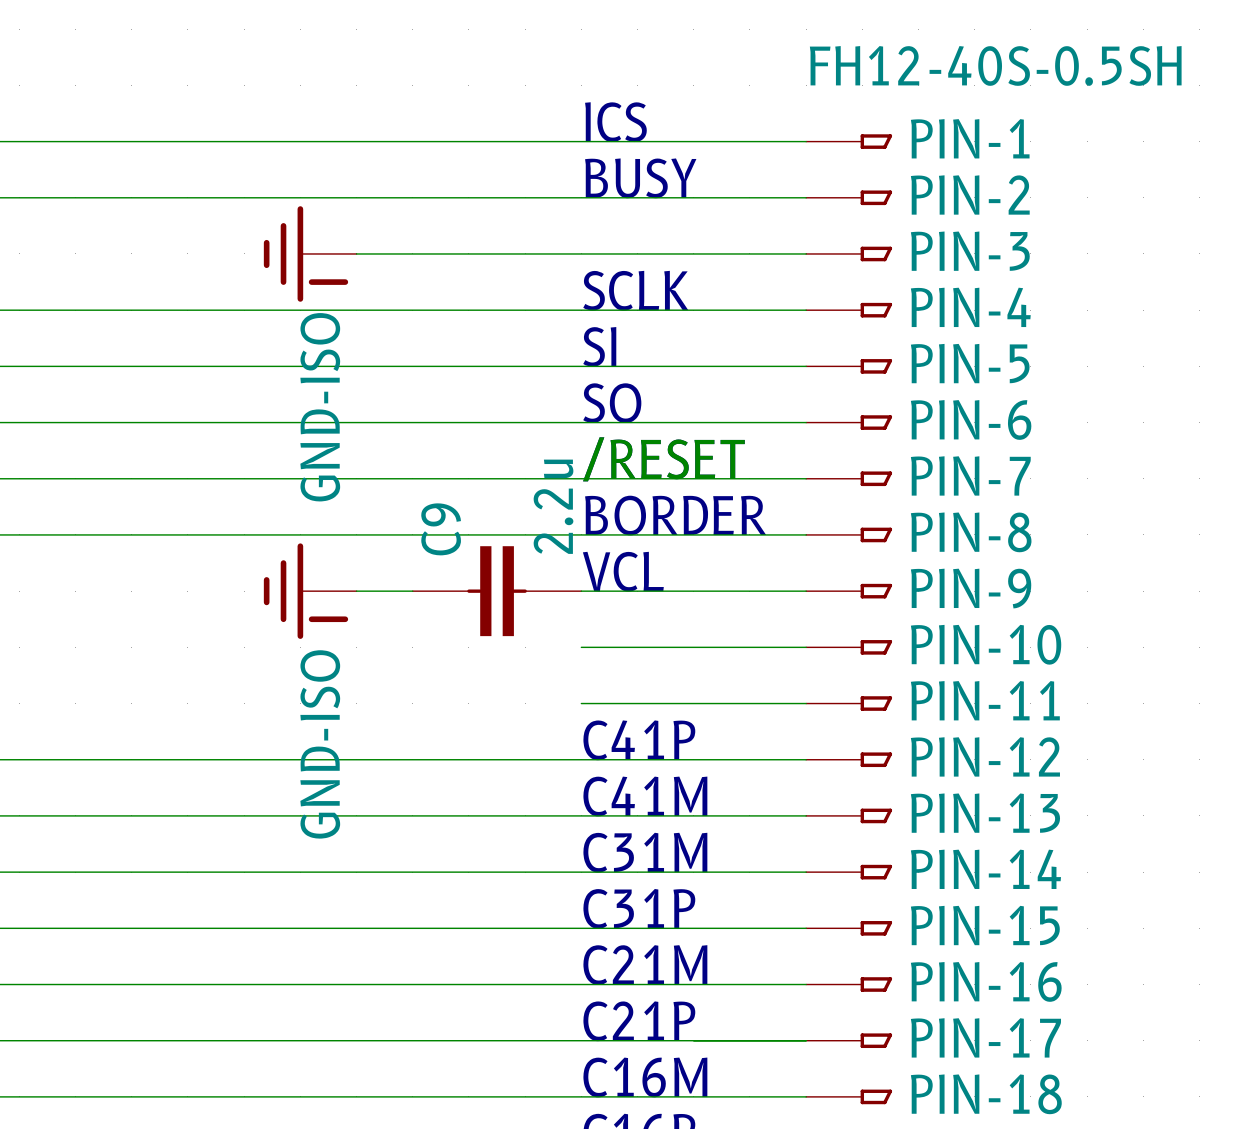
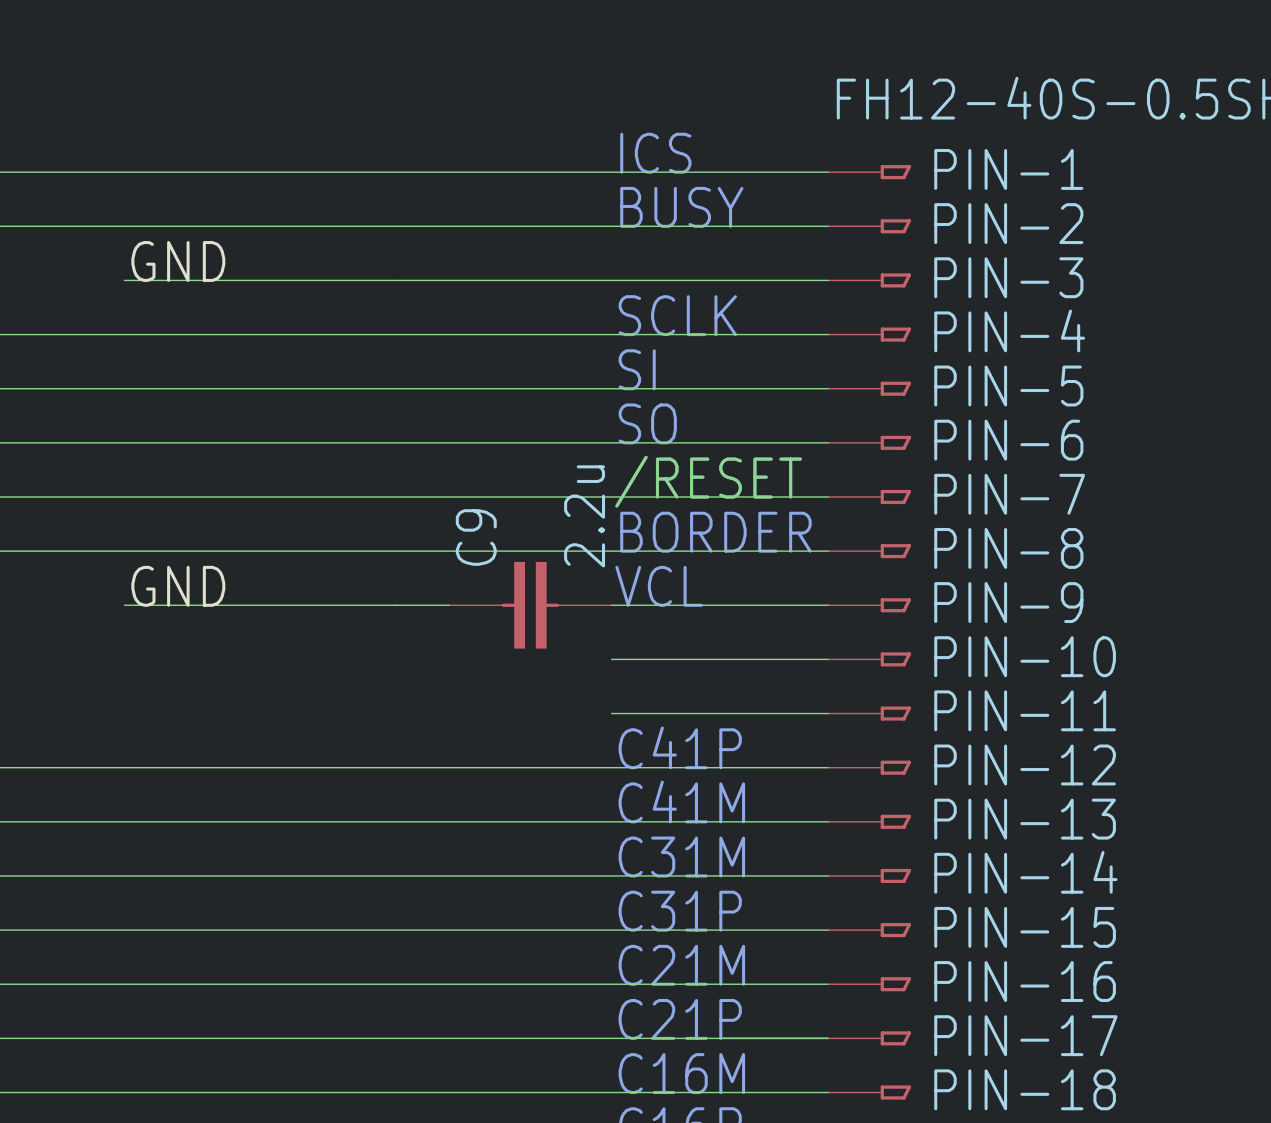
label: none -> GND (178, 261)
wire: none -> (124, 280) (395, 280)
power symbol: GND-ISO (310, 253) -> none
label: none -> GND (178, 586)
wire: none -> (124, 605) (395, 605)
power symbol: GND-ISO (310, 591) -> none

